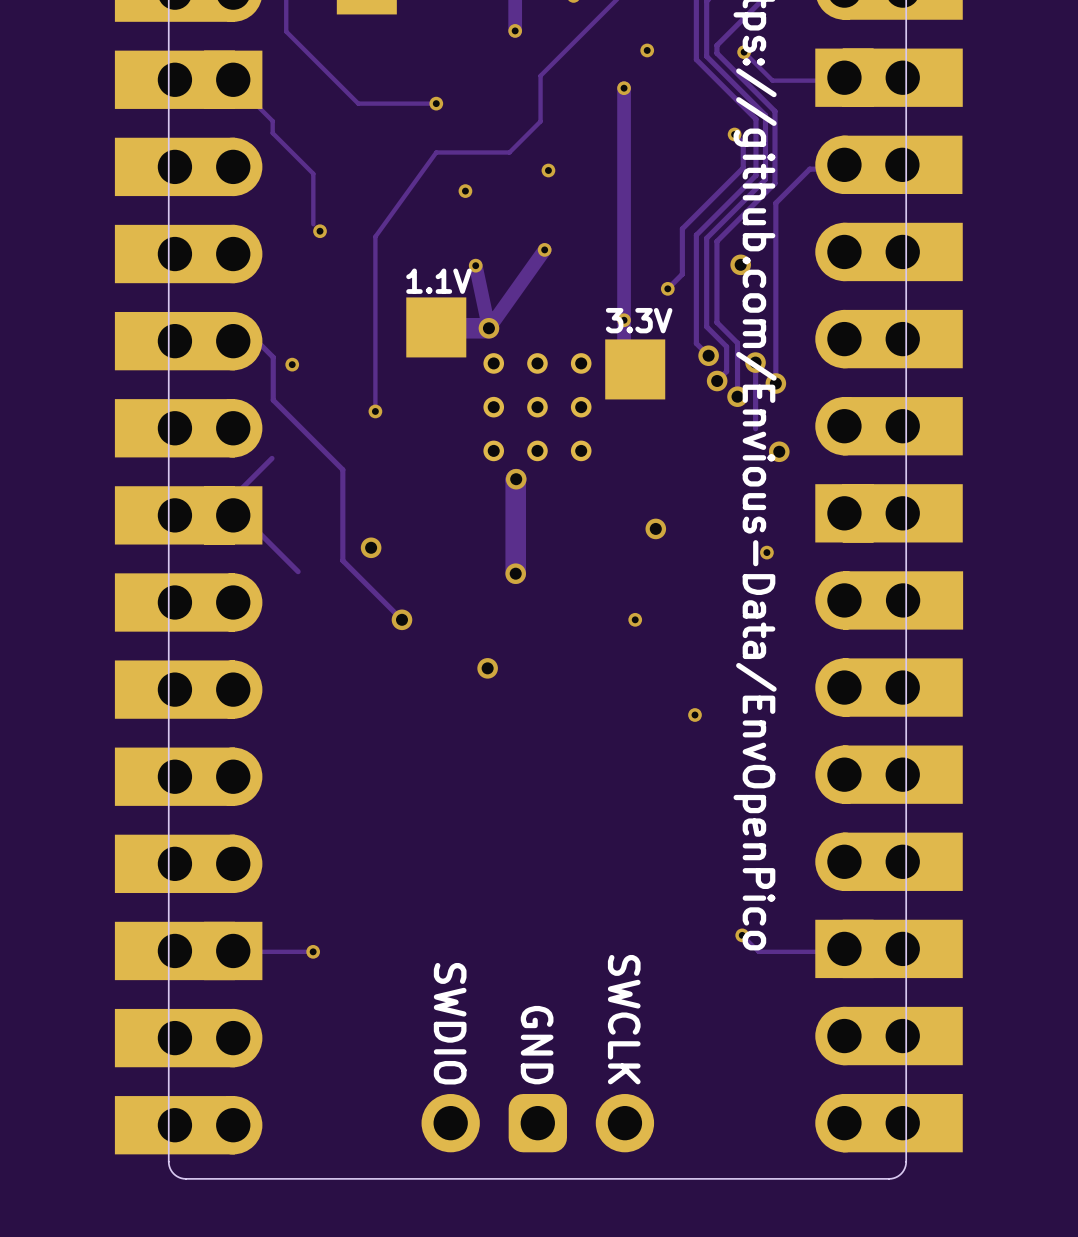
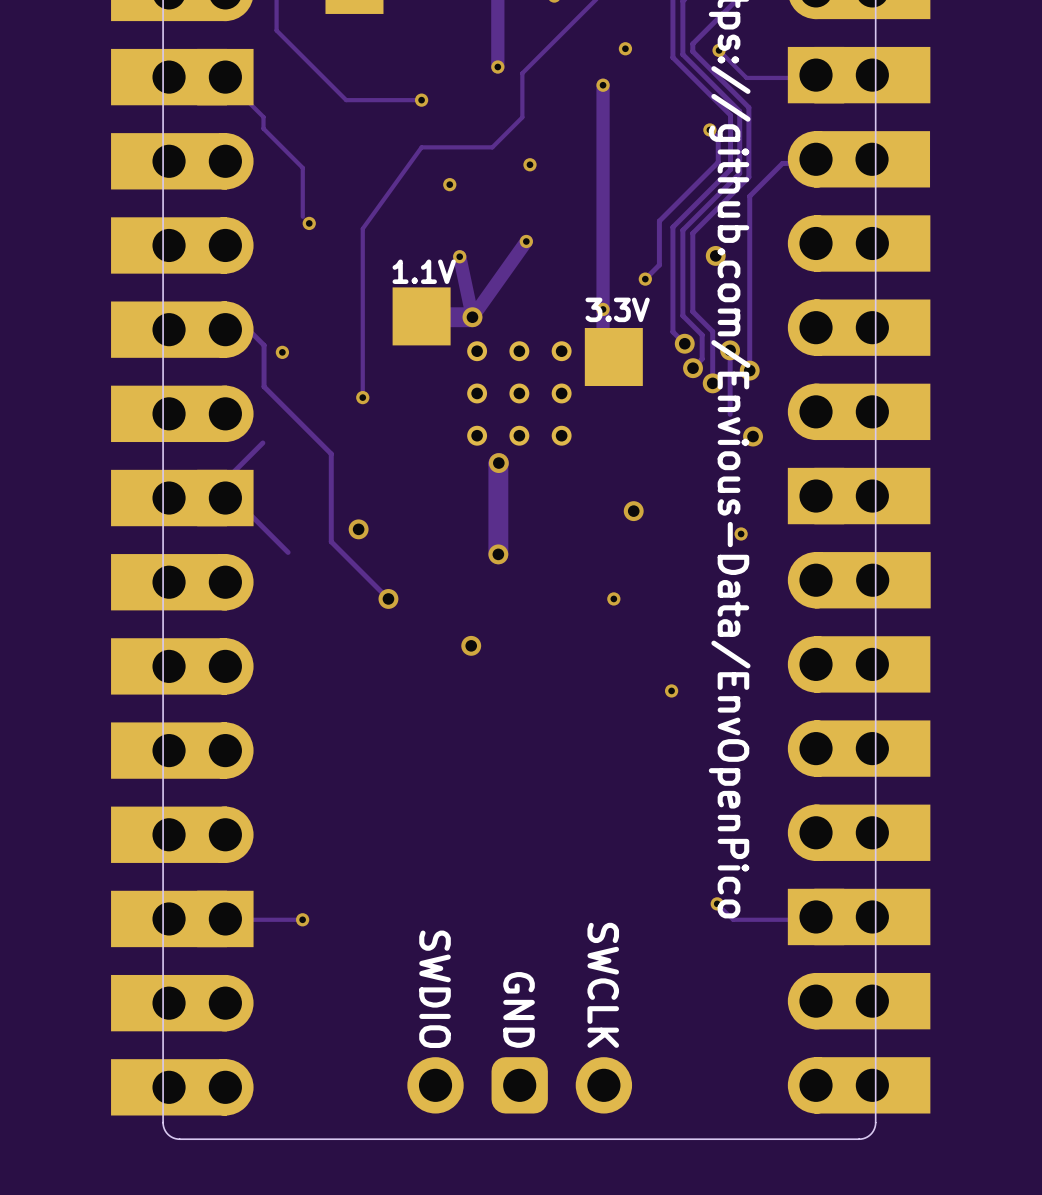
track: none -> (497, 29) (497, 66)
via: (515, 30) -> none
via: none -> (497, 66)

